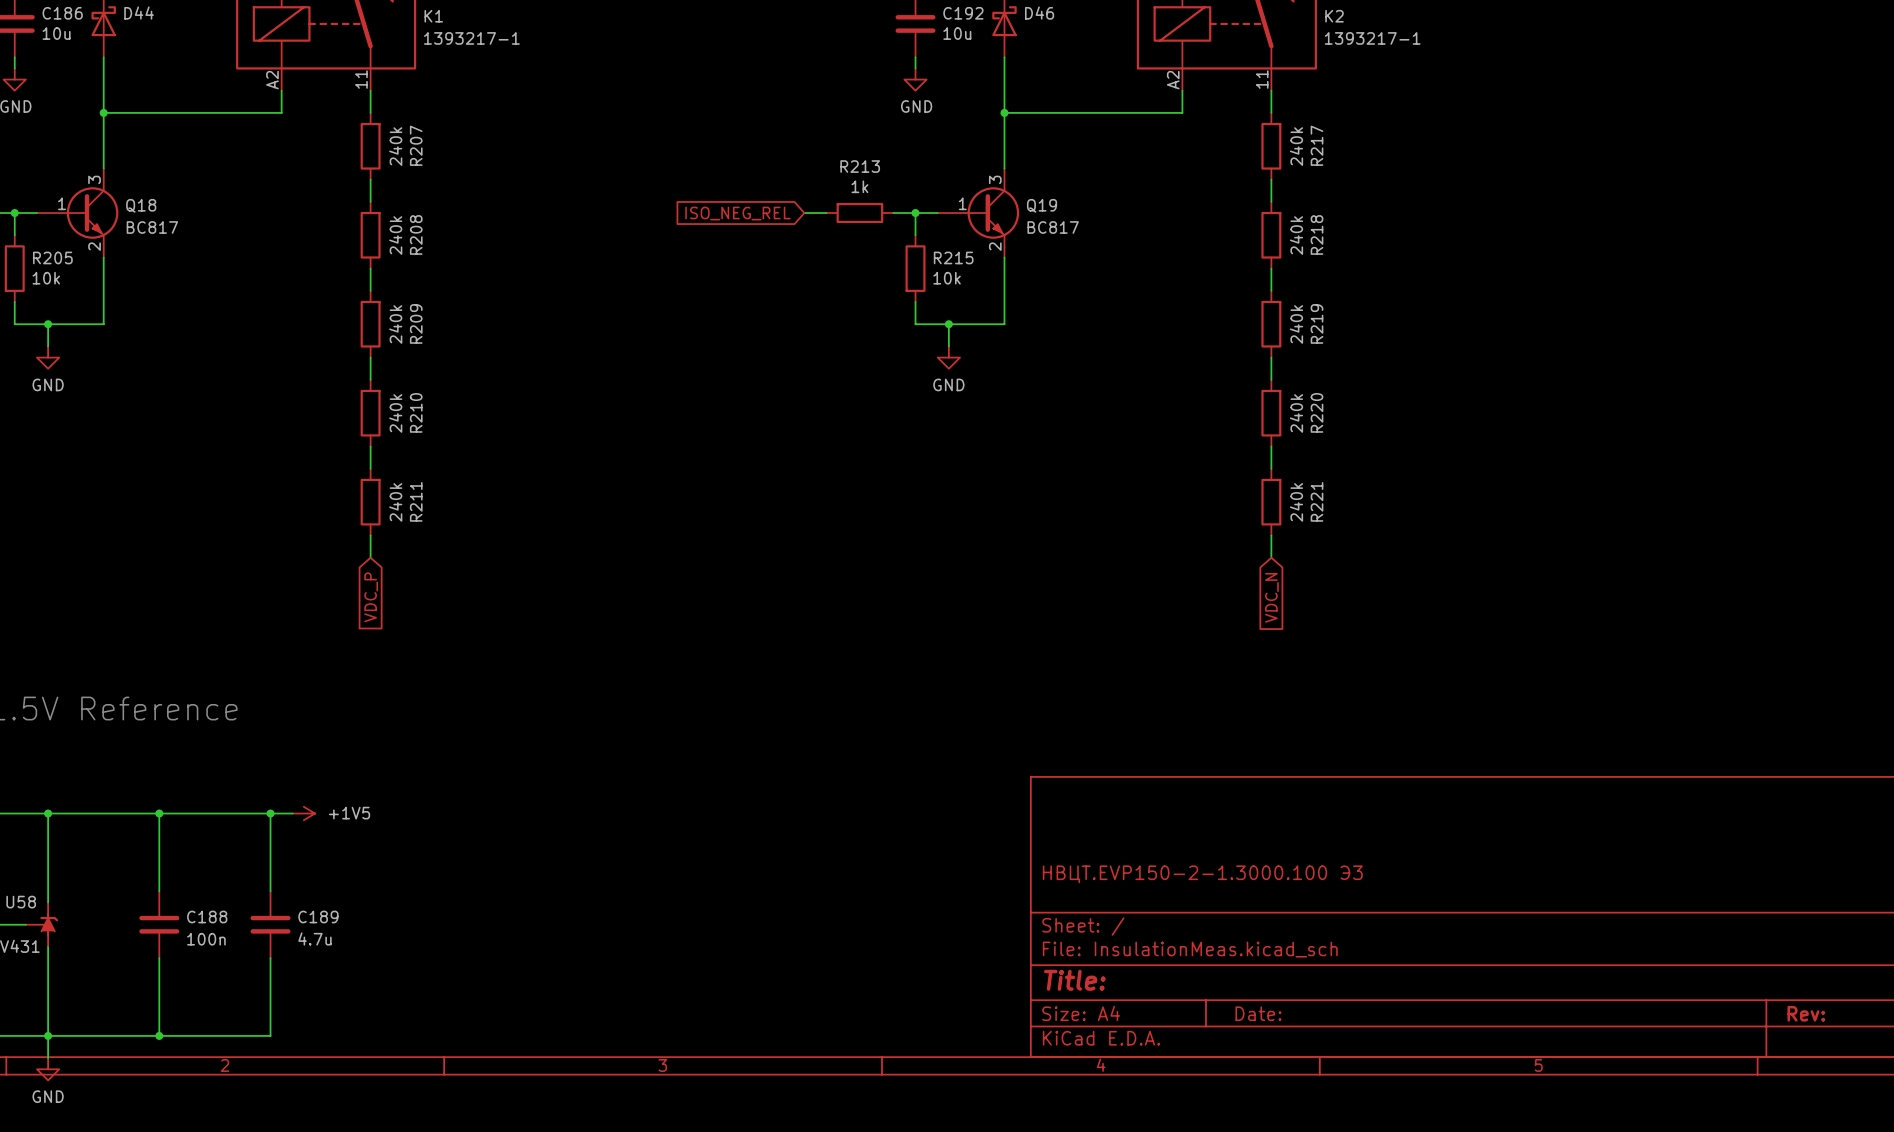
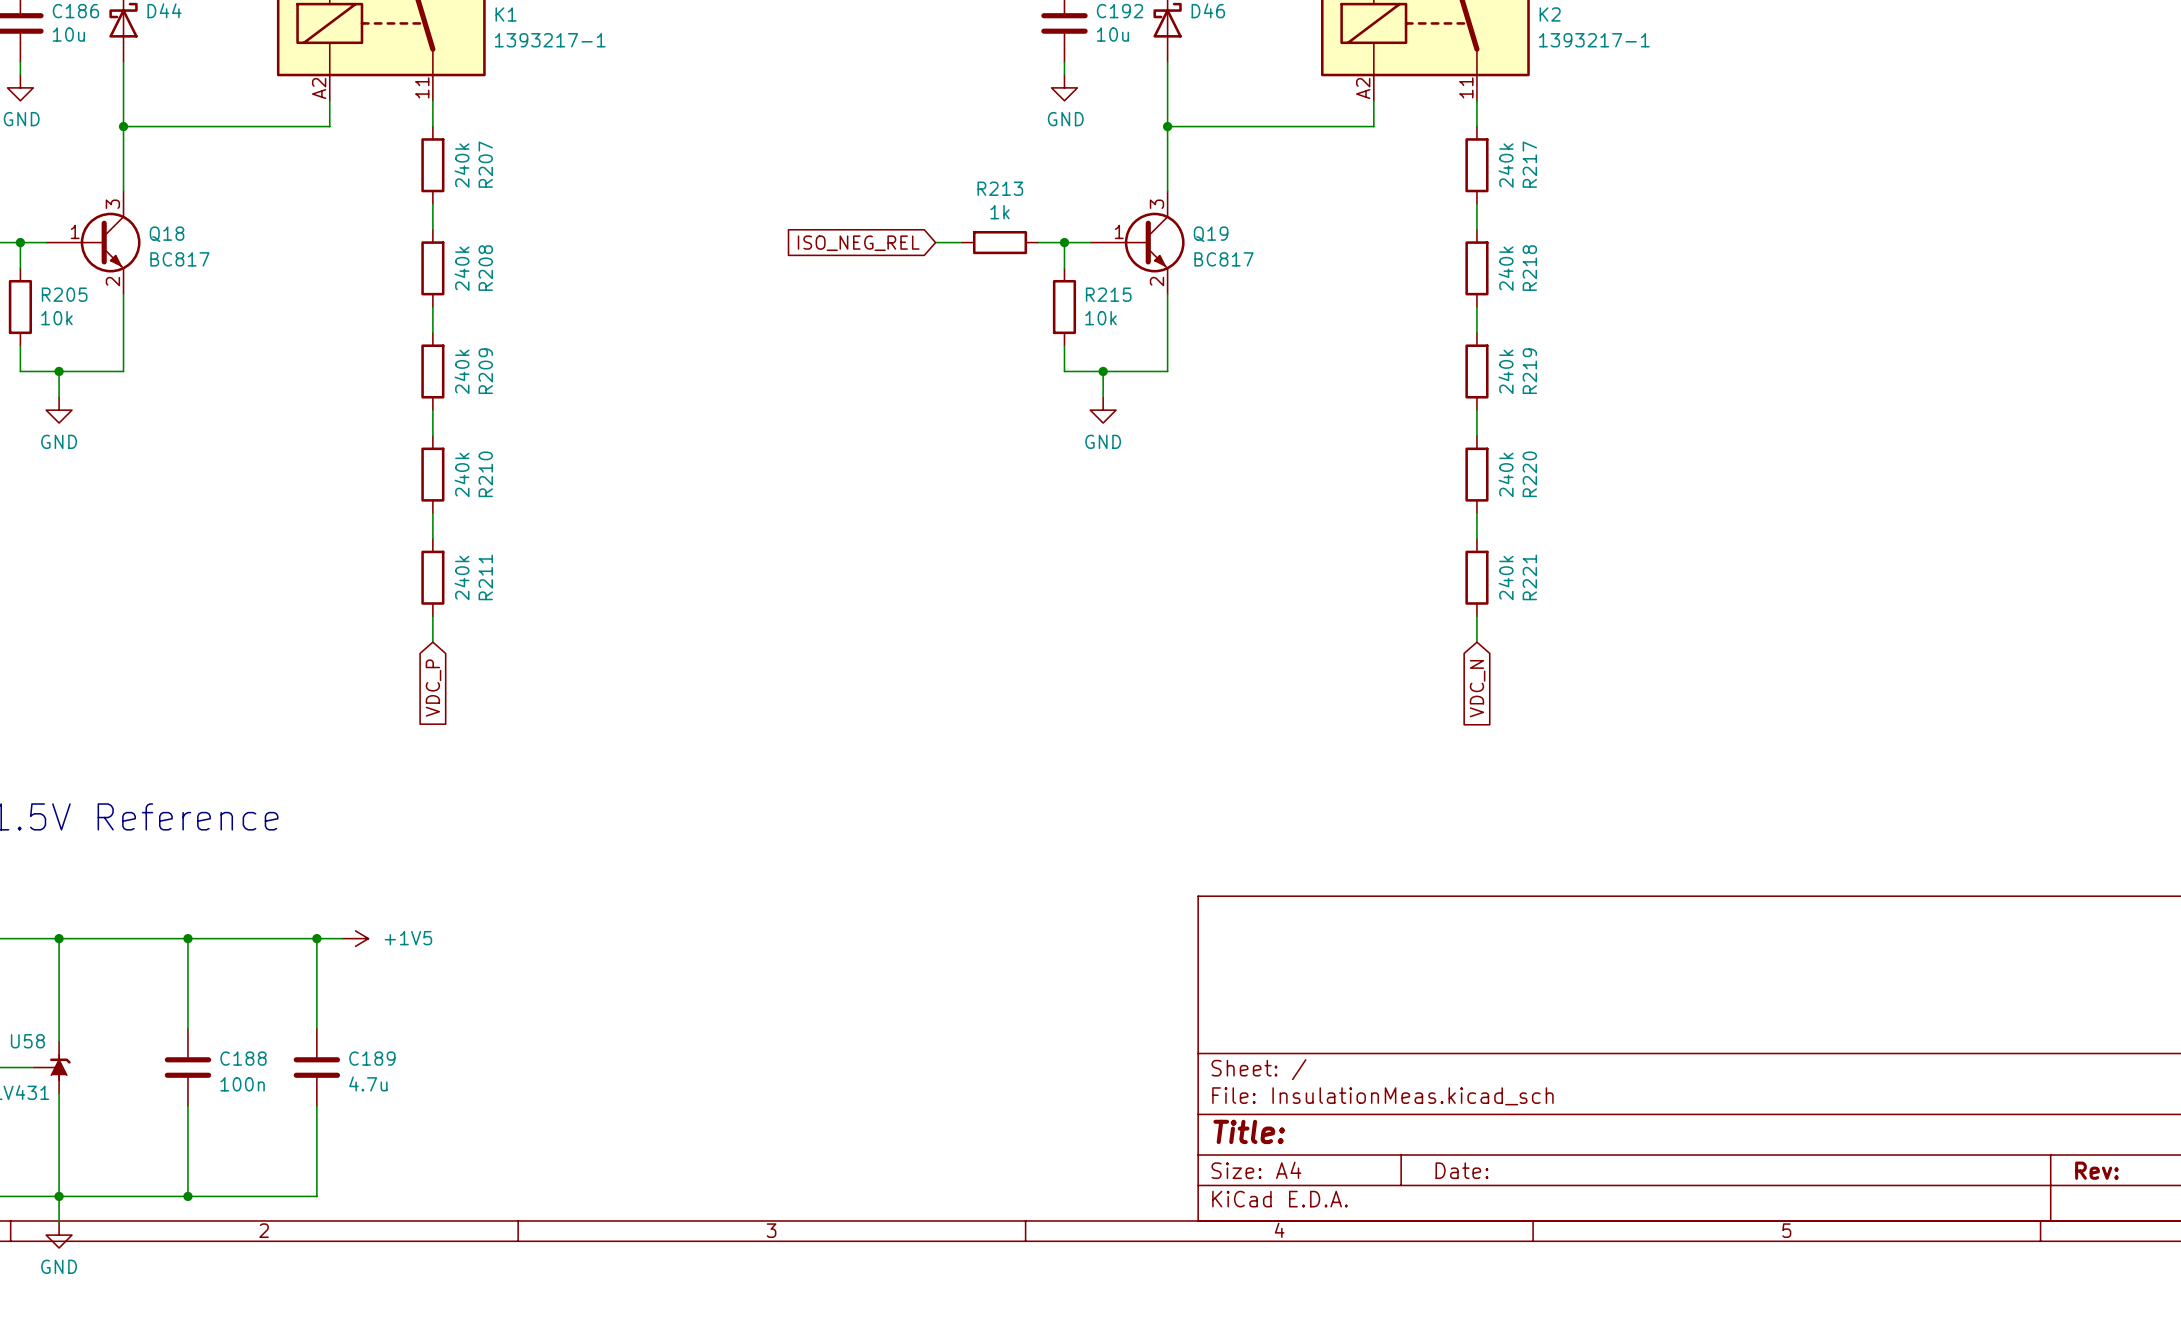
title block: НВЦТ.EVP150-2-1.3000.100 Э3 (1202, 874) -> none

